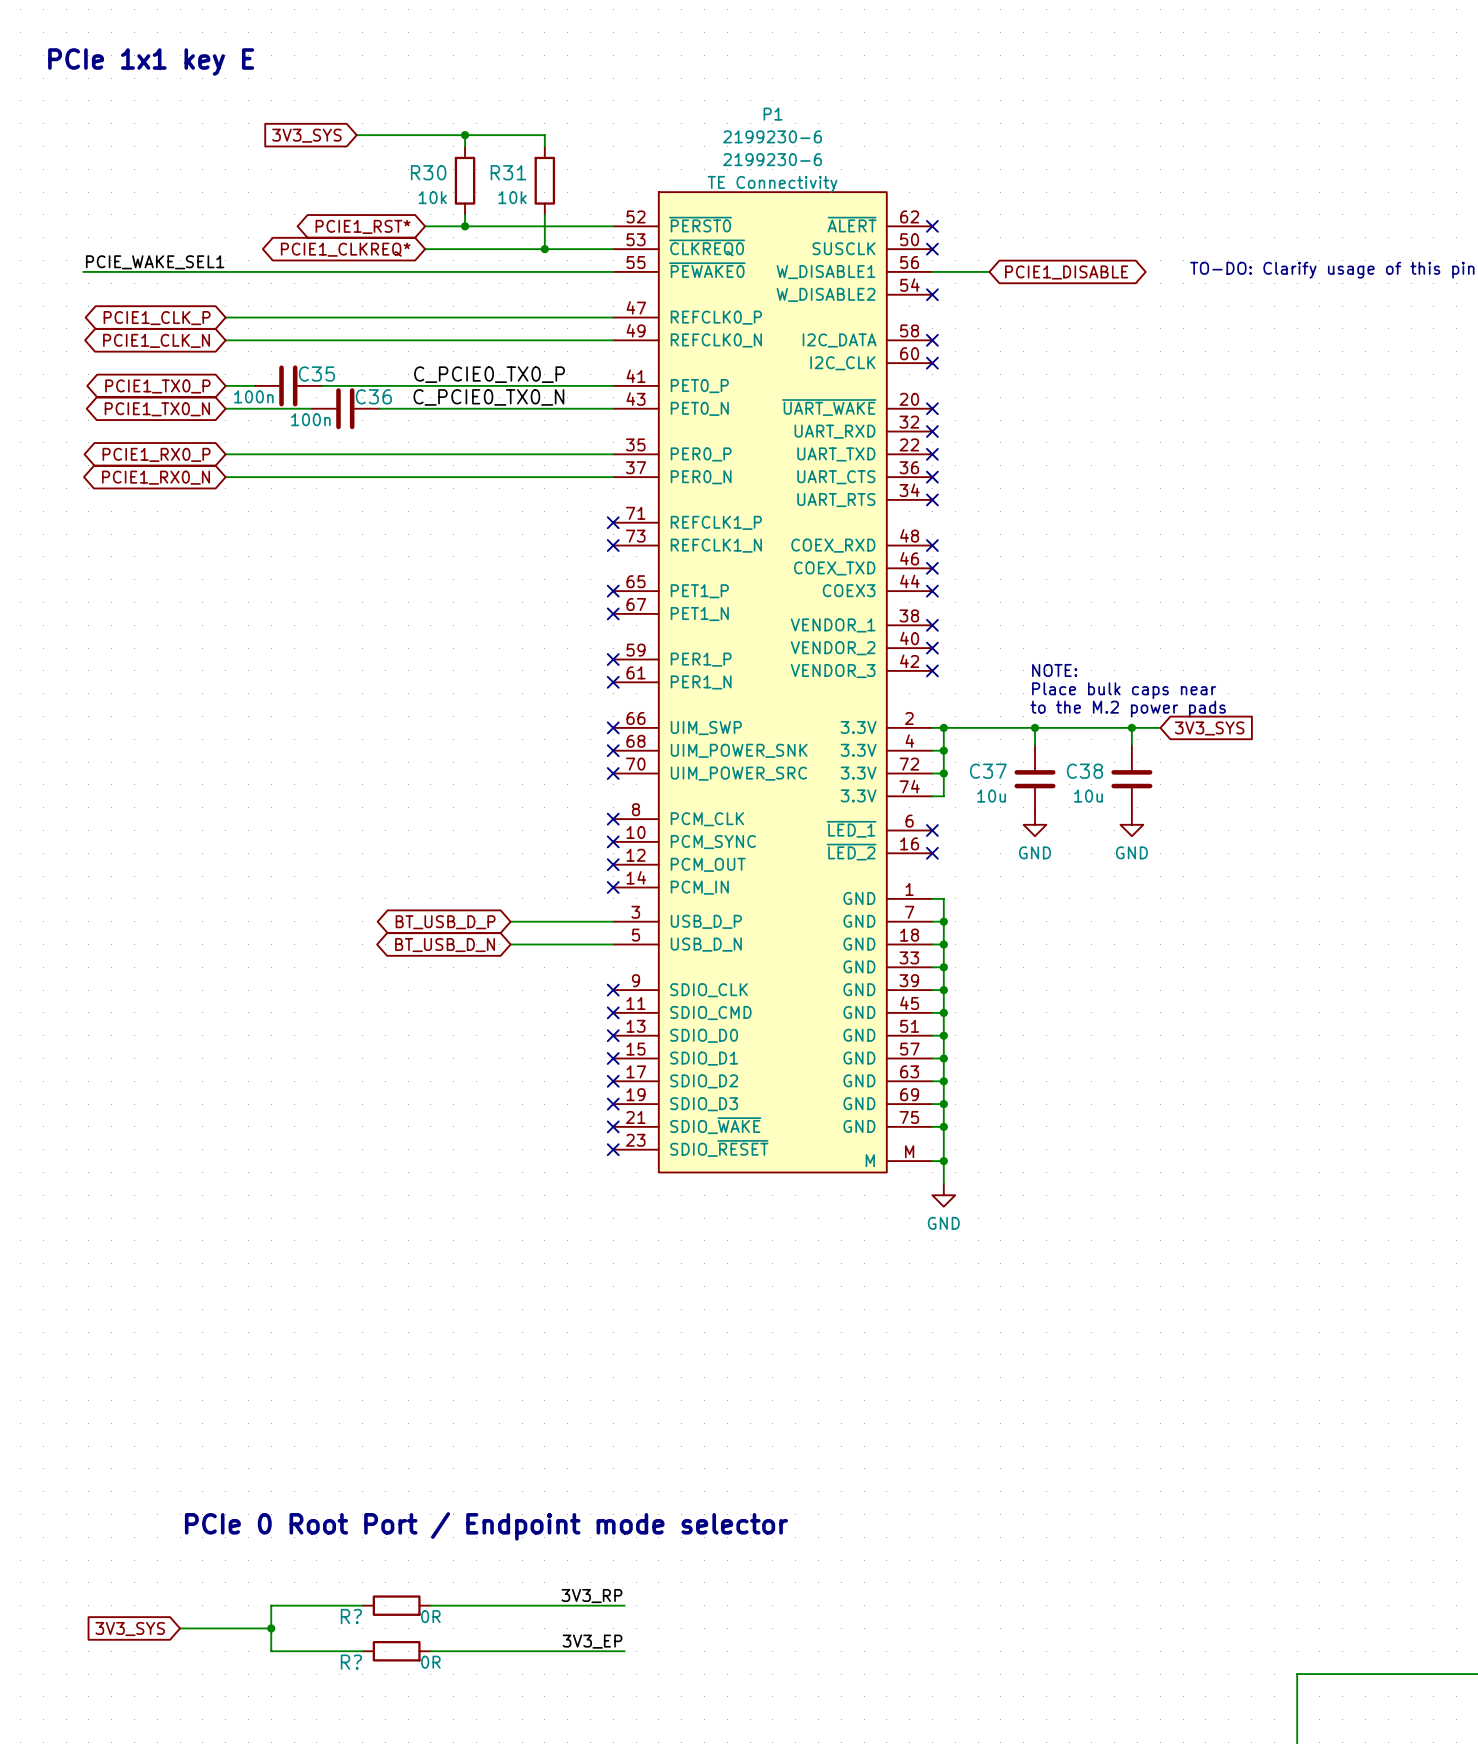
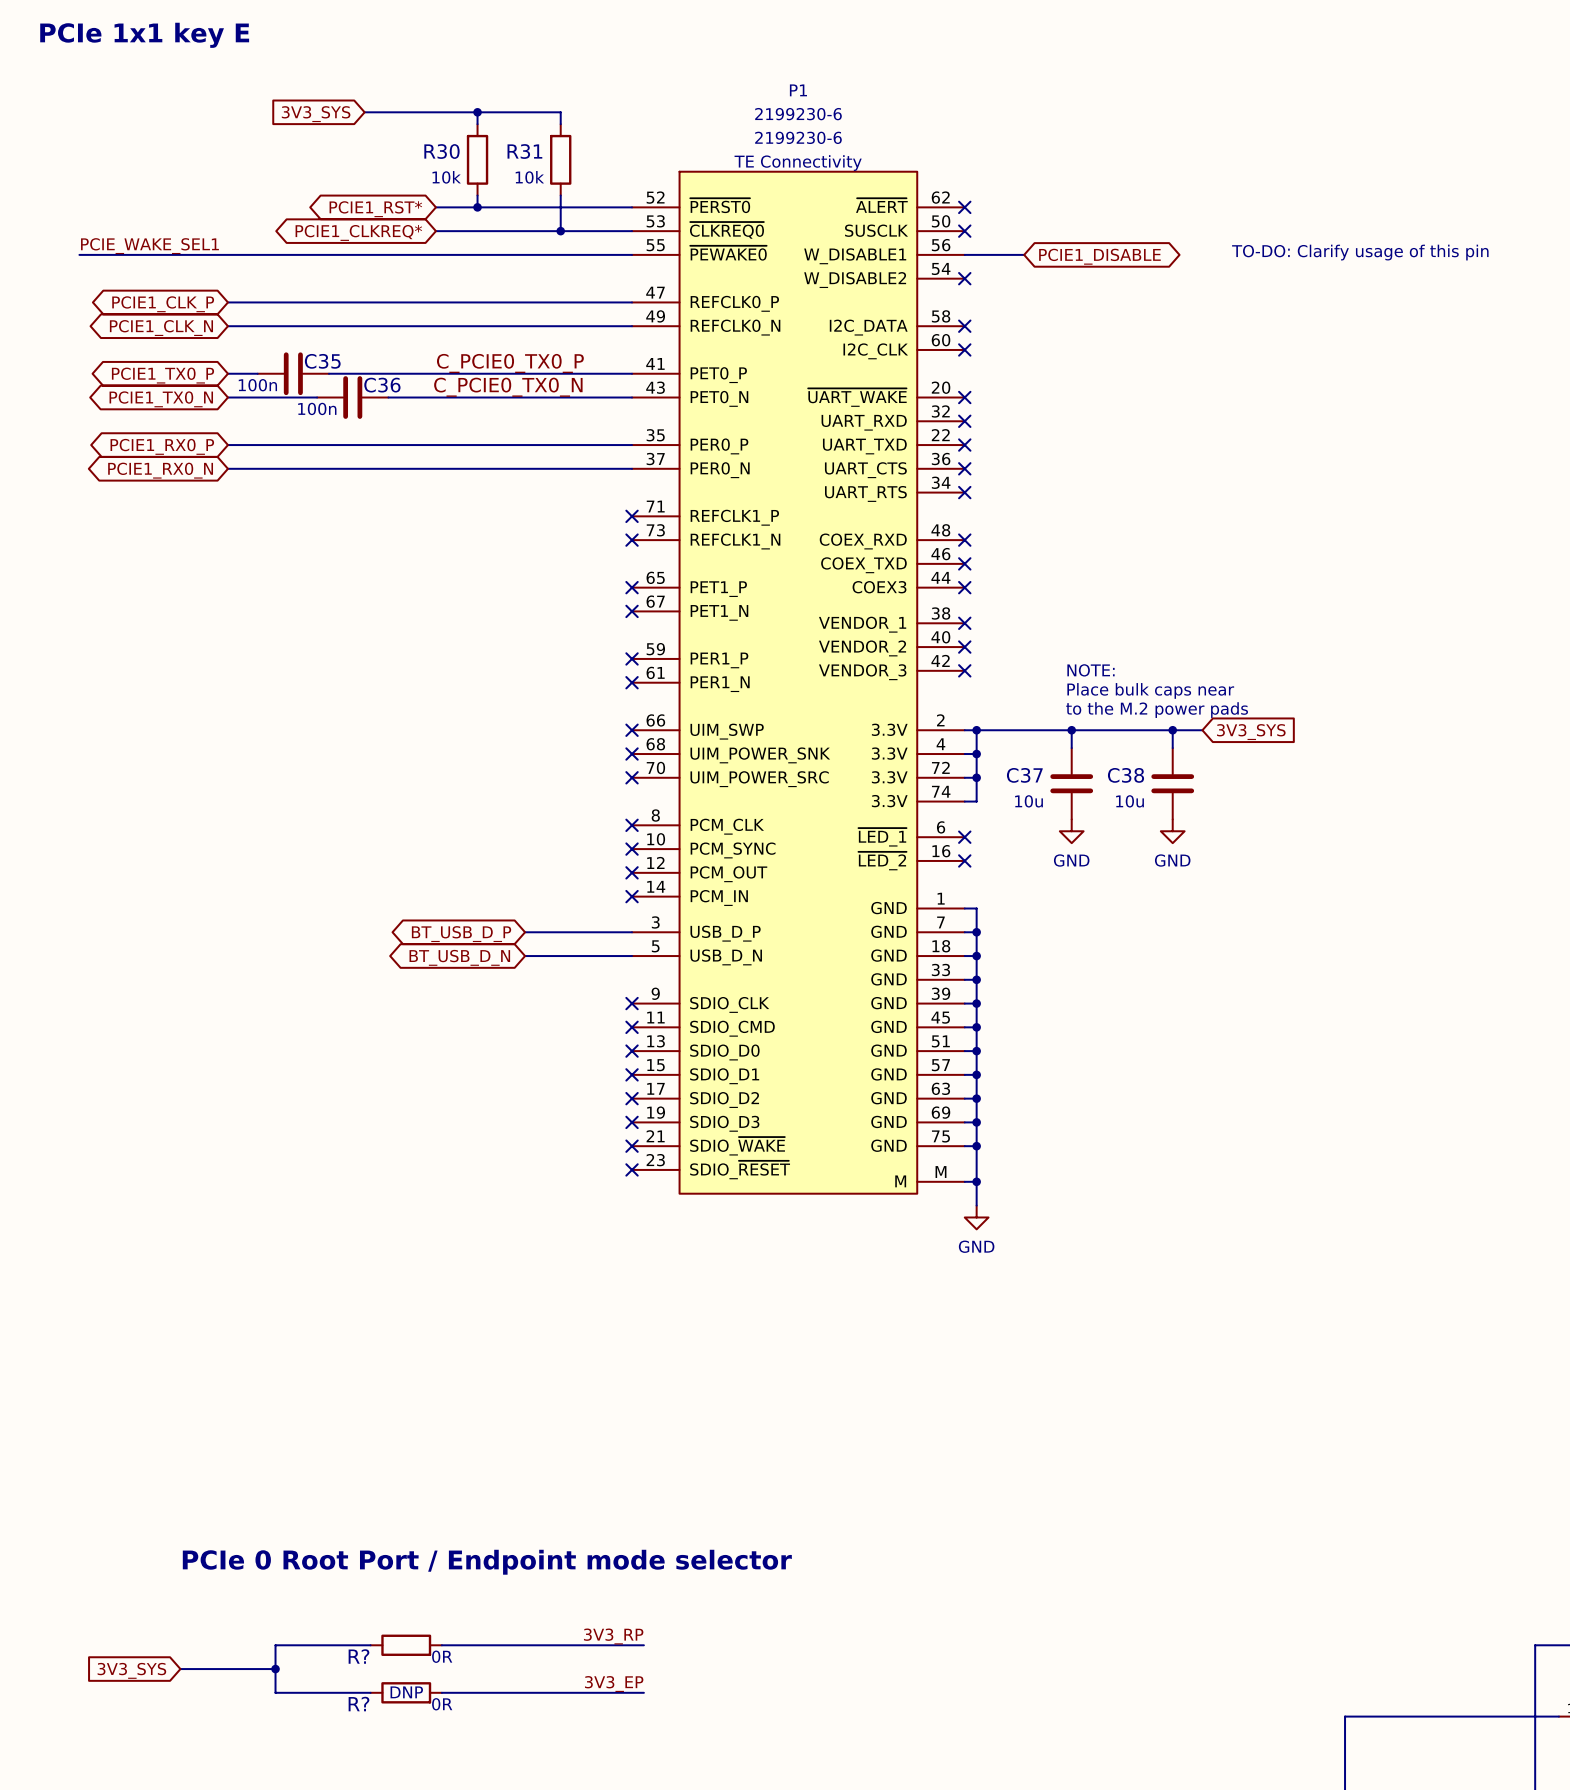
R? text: none -> DNP (406, 1692)

